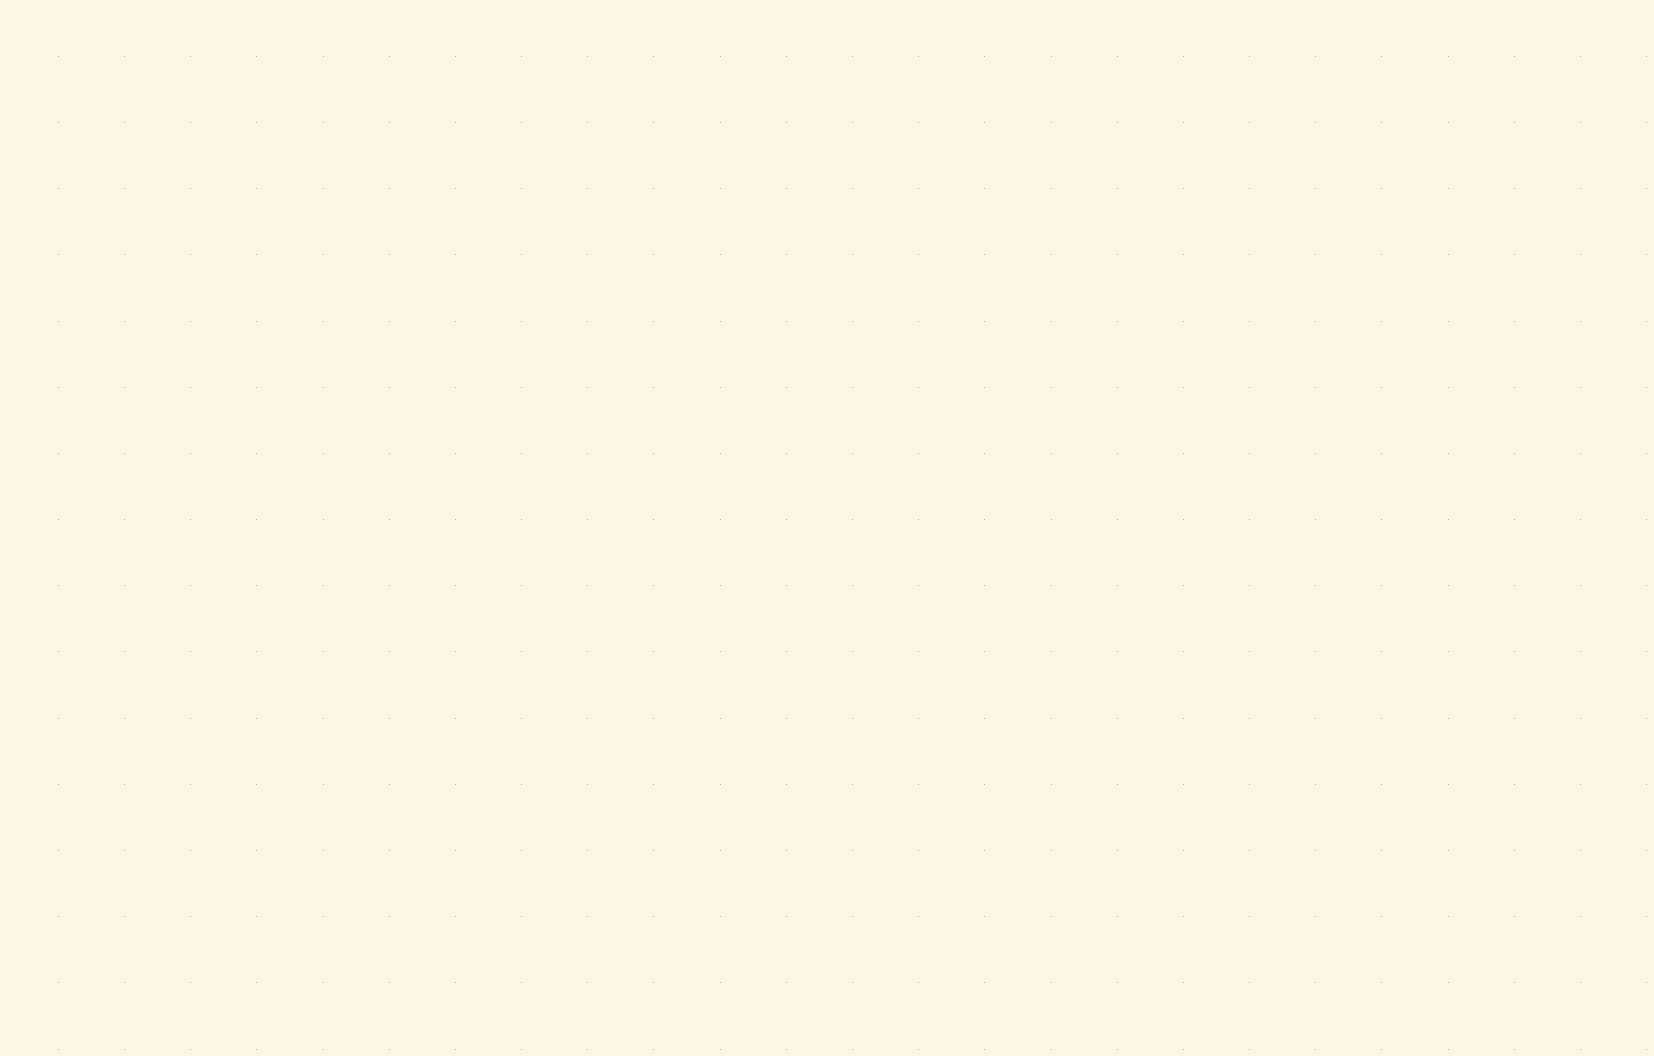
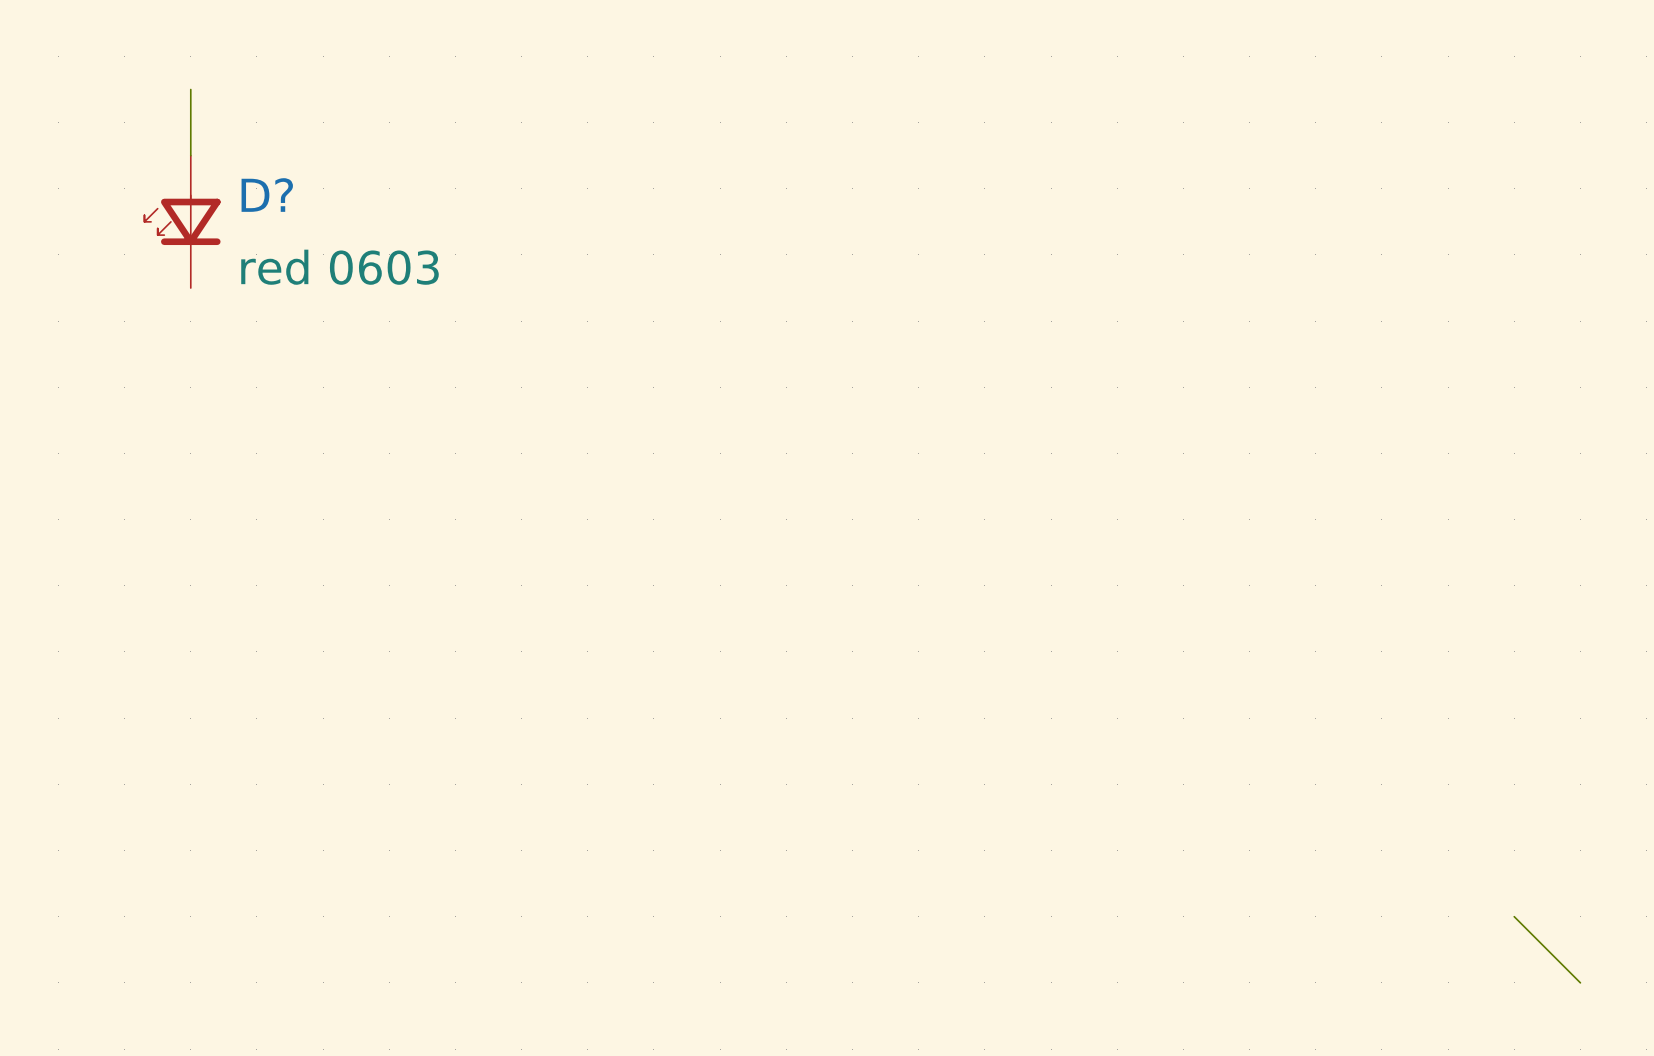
wire: none -> (190, 89) (190, 155)
D?: none -> red 0603 (182, 221)
wire: none -> (1514, 916) (1580, 982)

